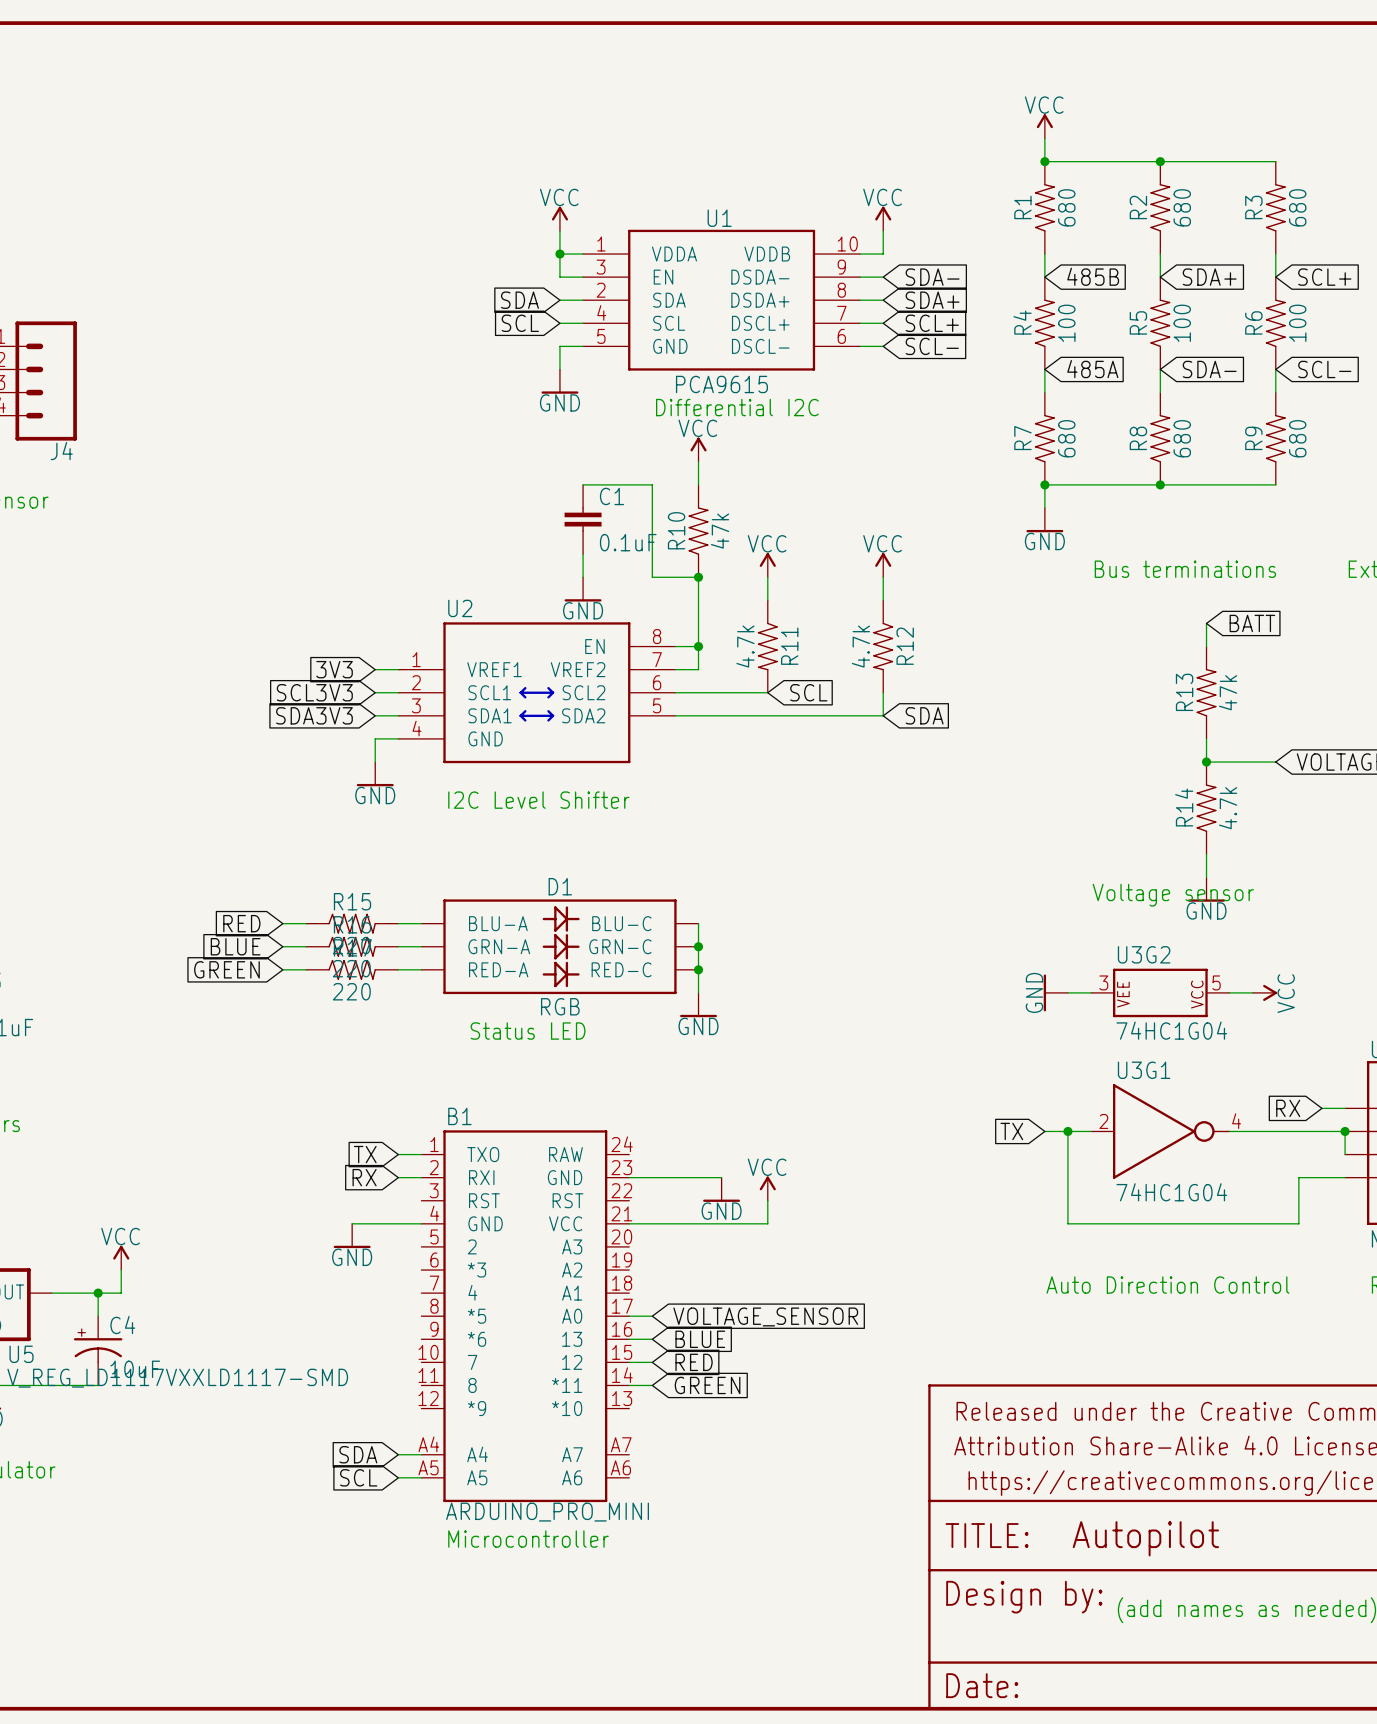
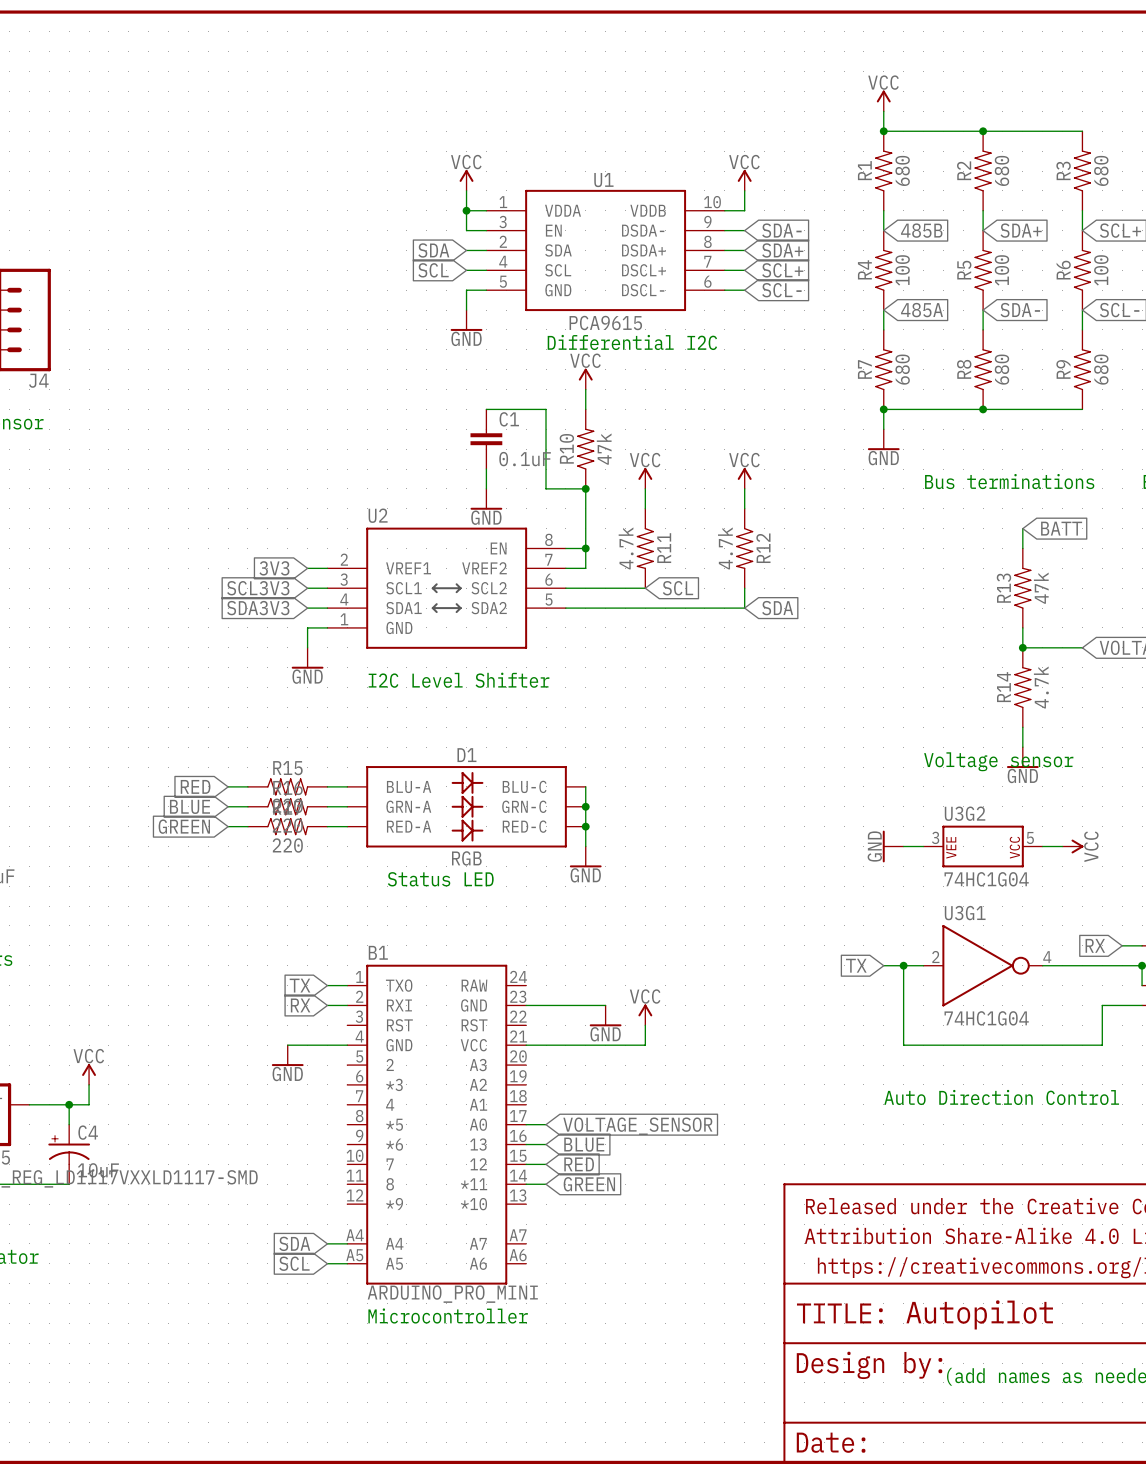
U2 pin number: 1 (416, 659) -> 2 (344, 559)
U2 pin number: 2 (416, 682) -> 3 (344, 579)
U2 pin number: 3 (416, 705) -> 4 (344, 599)
U2 pin number: 4 (416, 728) -> 1 (344, 619)

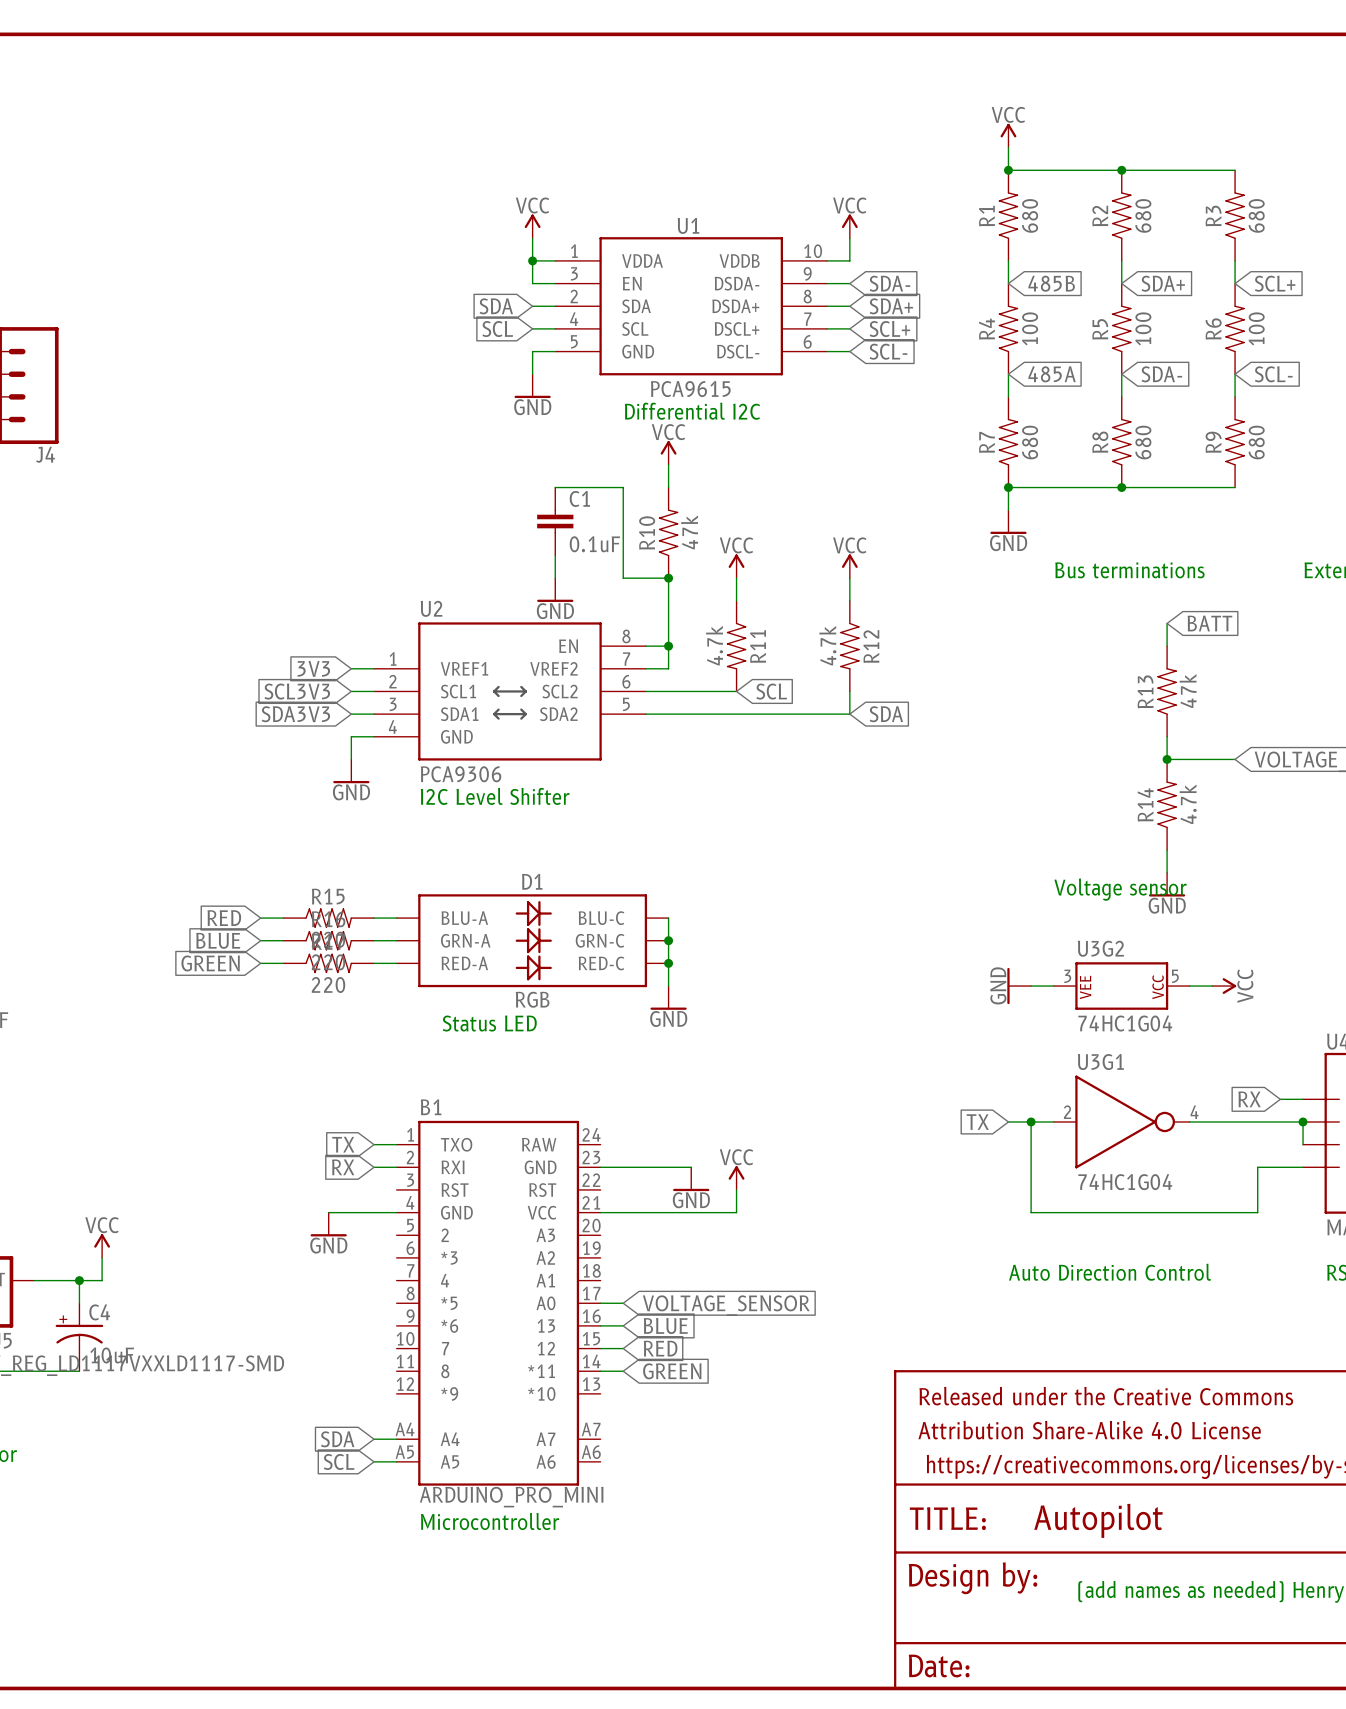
U2 pin number: 2 (344, 559) -> 1 (393, 658)
U2 pin number: 3 (344, 579) -> 2 (392, 681)
U2 pin number: 4 (344, 599) -> 3 (393, 704)
U2 pin number: 1 (344, 619) -> 4 (392, 726)
U2 value: none -> PCA9306 (461, 774)

